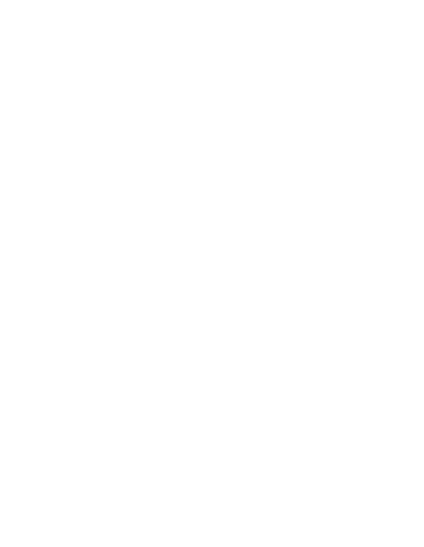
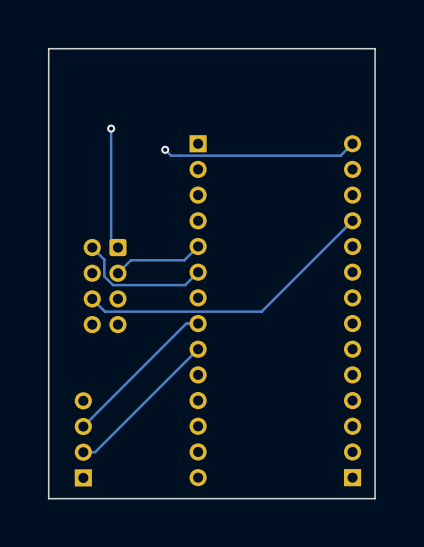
board edge: none -> (375, 48) (48, 48) (48, 498) (375, 498) (375, 48)
track: none -> (111, 128) (111, 240) (117, 247)
via: none -> (111, 128)
track: none -> (352, 143) (340, 155) (171, 155) (164, 149)
via: none -> (165, 149)
track: none -> (352, 220) (261, 311) (105, 311) (92, 298)
track: none -> (198, 246) (184, 260) (130, 260) (117, 273)
track: none -> (92, 247) (104, 259) (104, 276) (113, 285) (185, 285) (198, 272)
part: none -> (105, 286)
part: none -> (198, 310)
part: none -> (352, 310)
track: none -> (198, 323) (186, 323) (83, 426)
track: none -> (198, 349) (95, 452) (83, 452)
part: none -> (83, 439)

